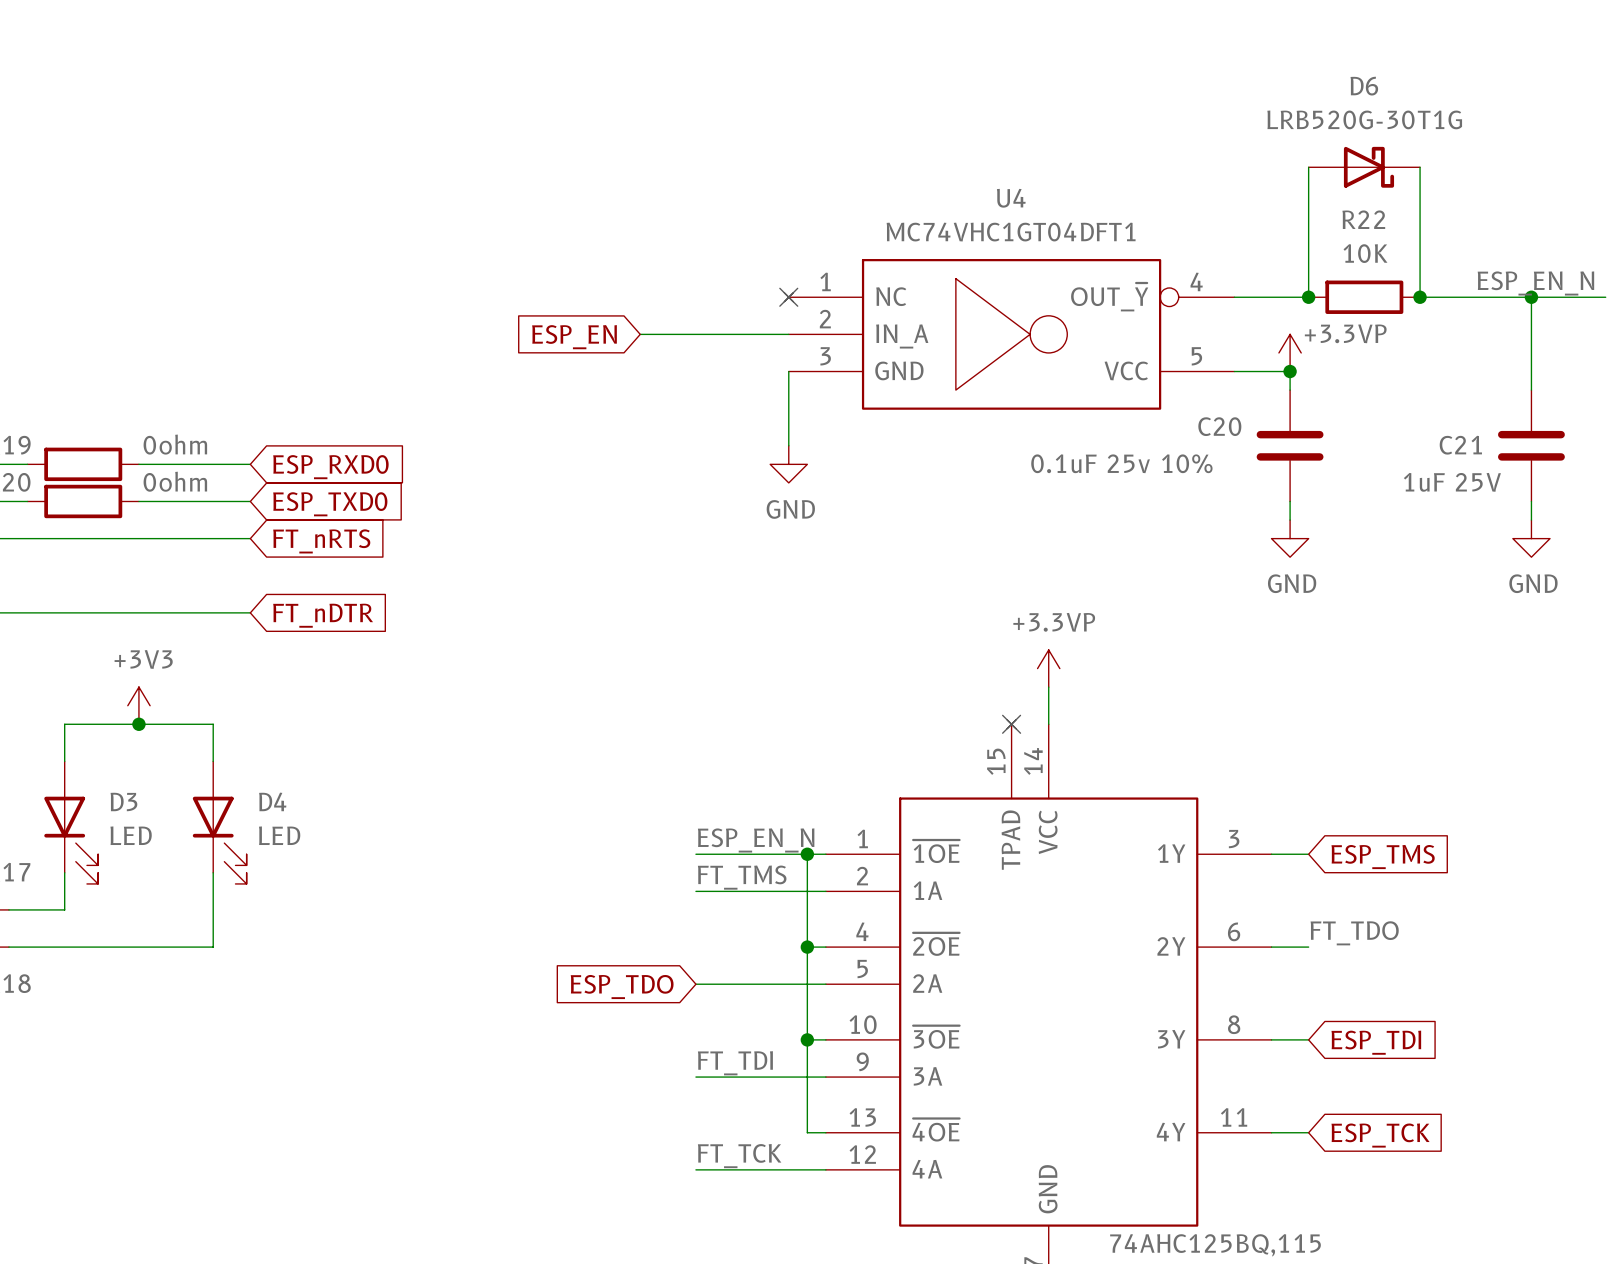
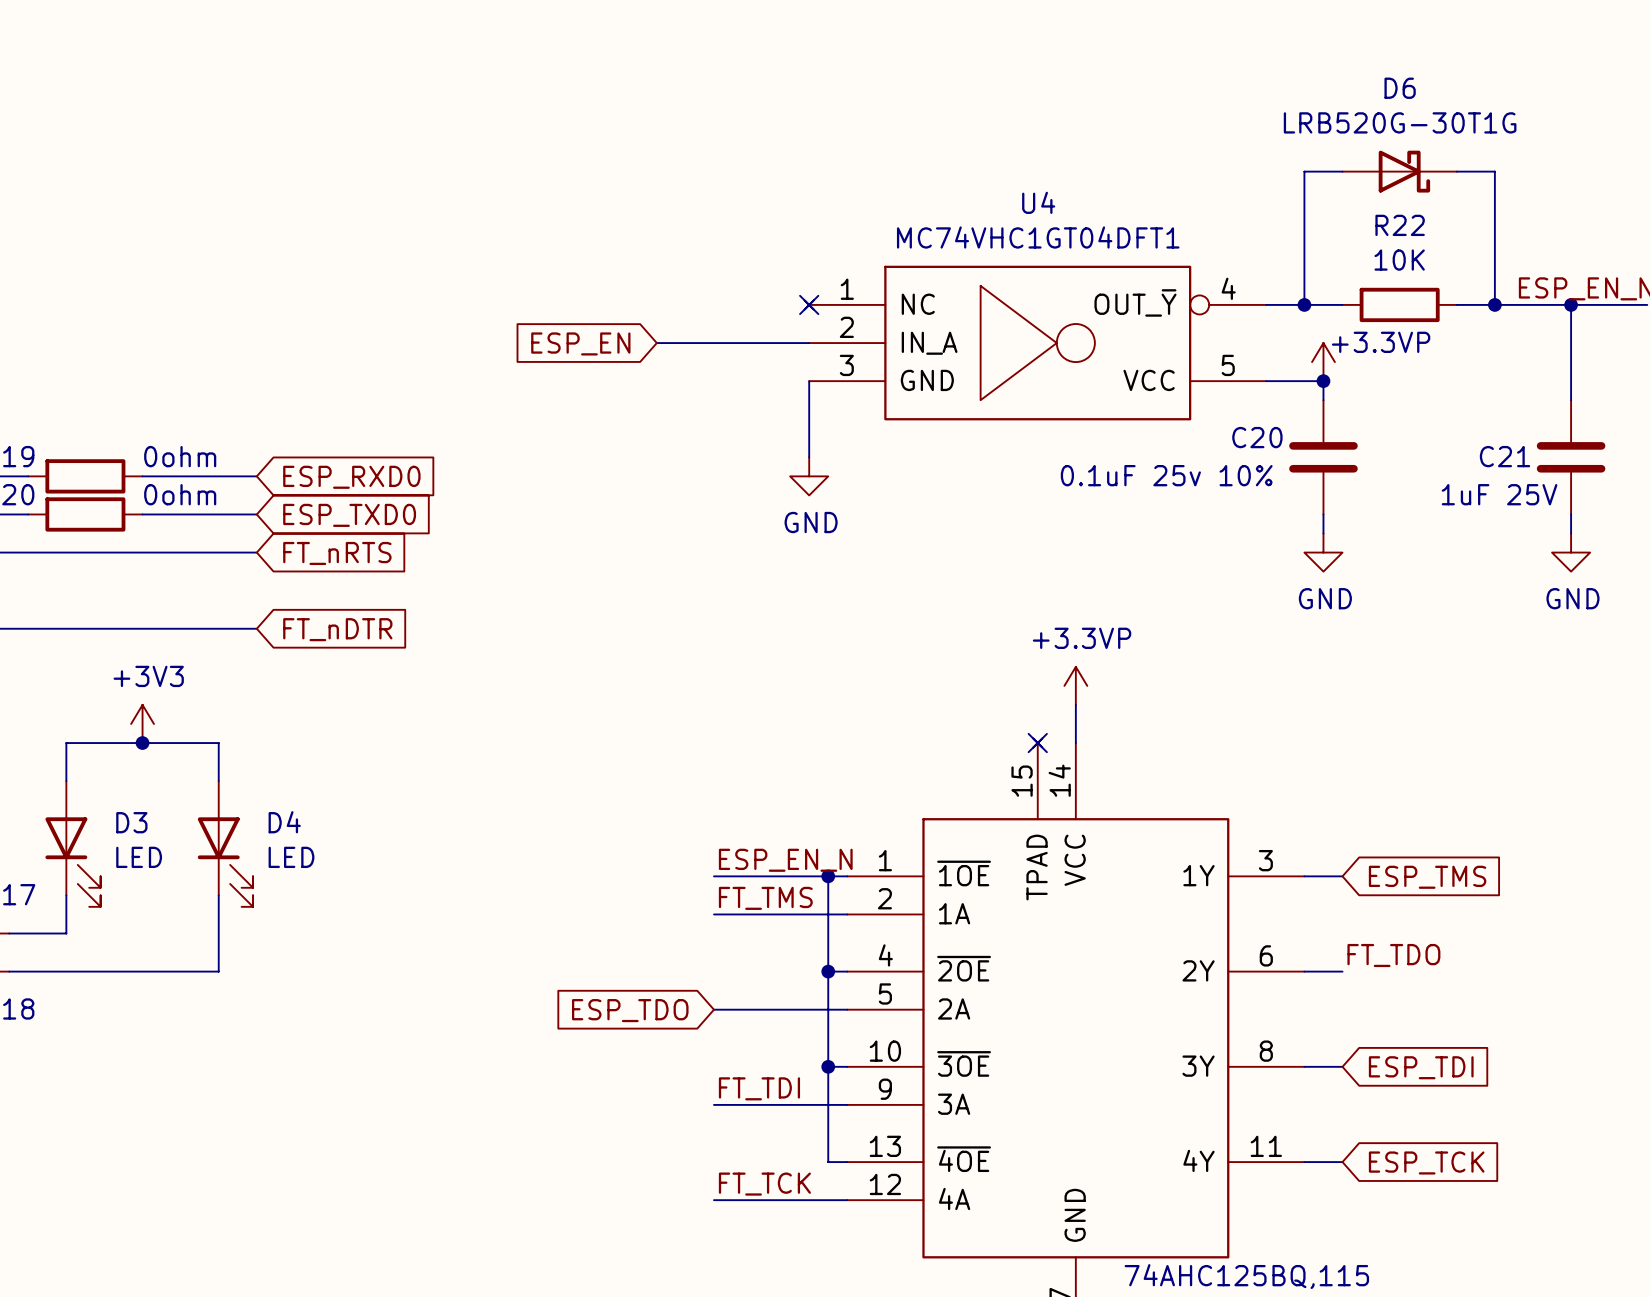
wire: (1308, 167) (1308, 297) -> (1342, 171) (1304, 171) (1304, 304)
wire: (1420, 167) (1420, 297) -> (1456, 171) (1494, 171) (1494, 304)
junction position: (1308, 297) -> (1304, 304)
junction position: (1420, 297) -> (1494, 304)

